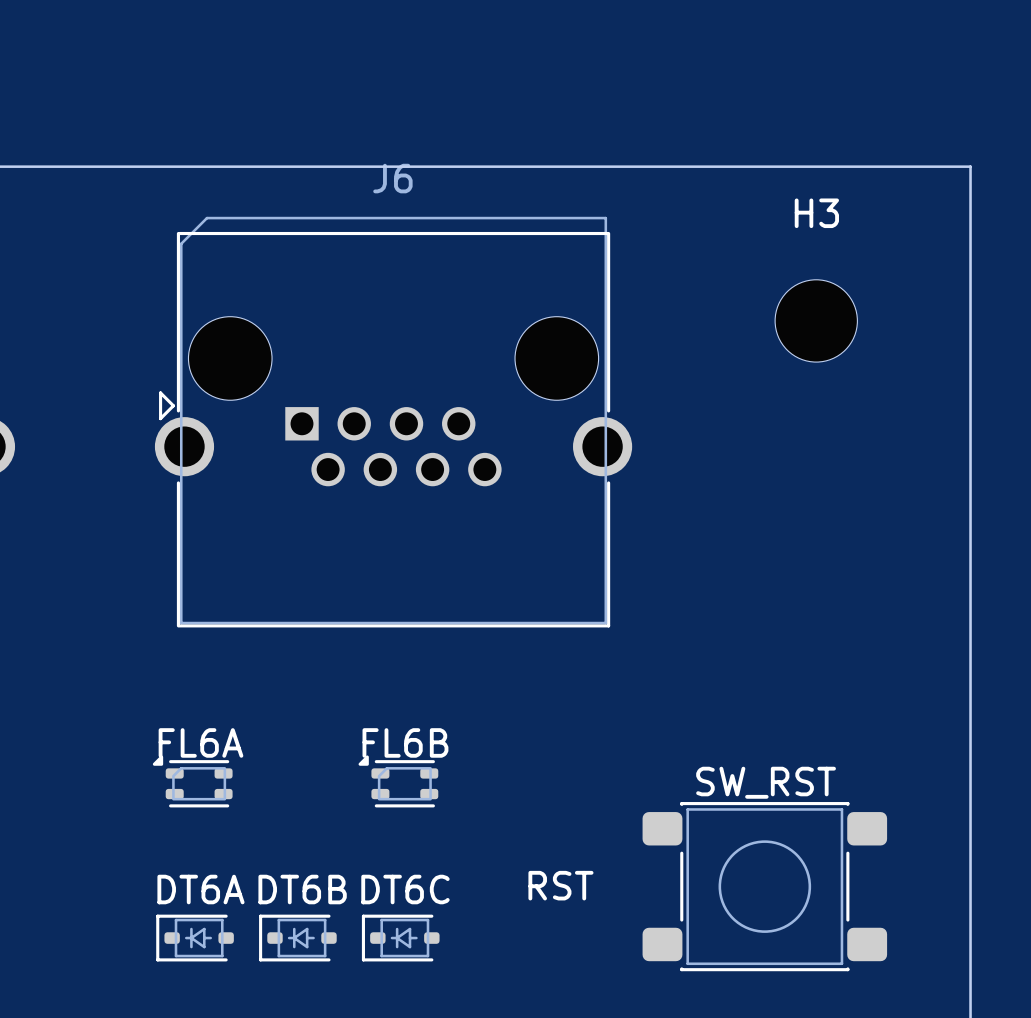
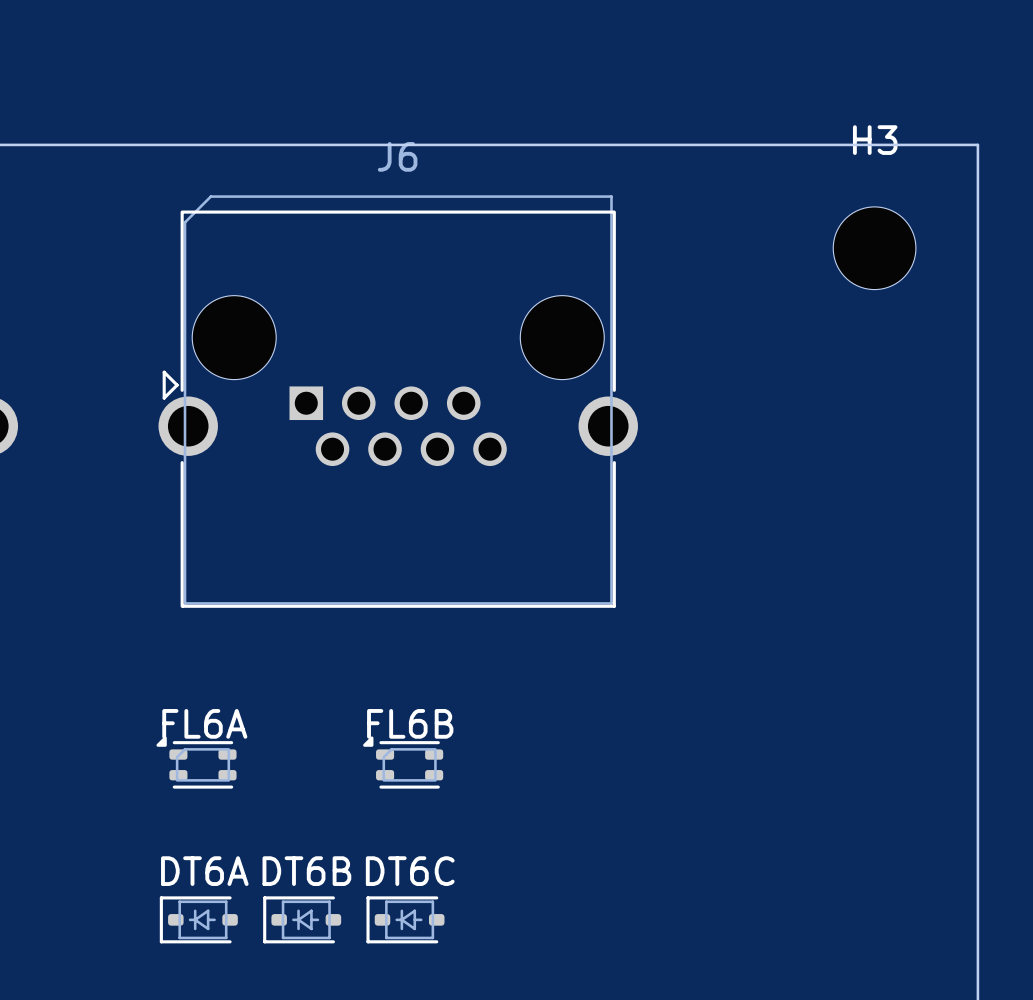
H3 position: (816, 320) -> (874, 248)
text: RST (560, 885) -> none
SW_RST: (764, 886) -> none

